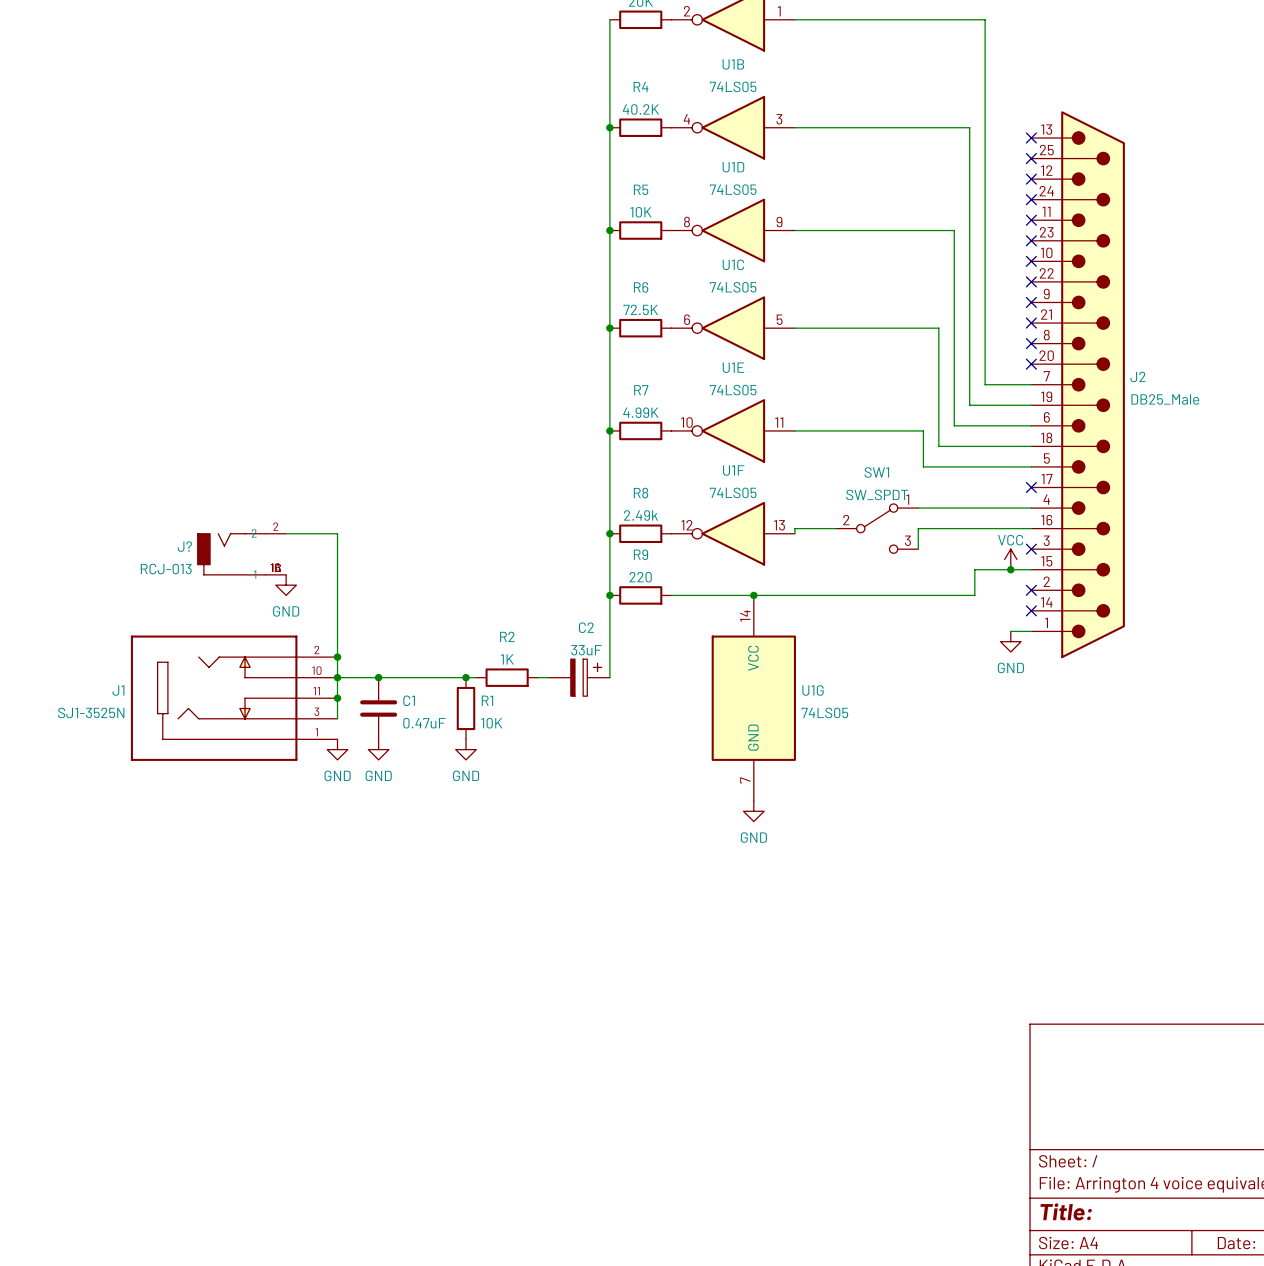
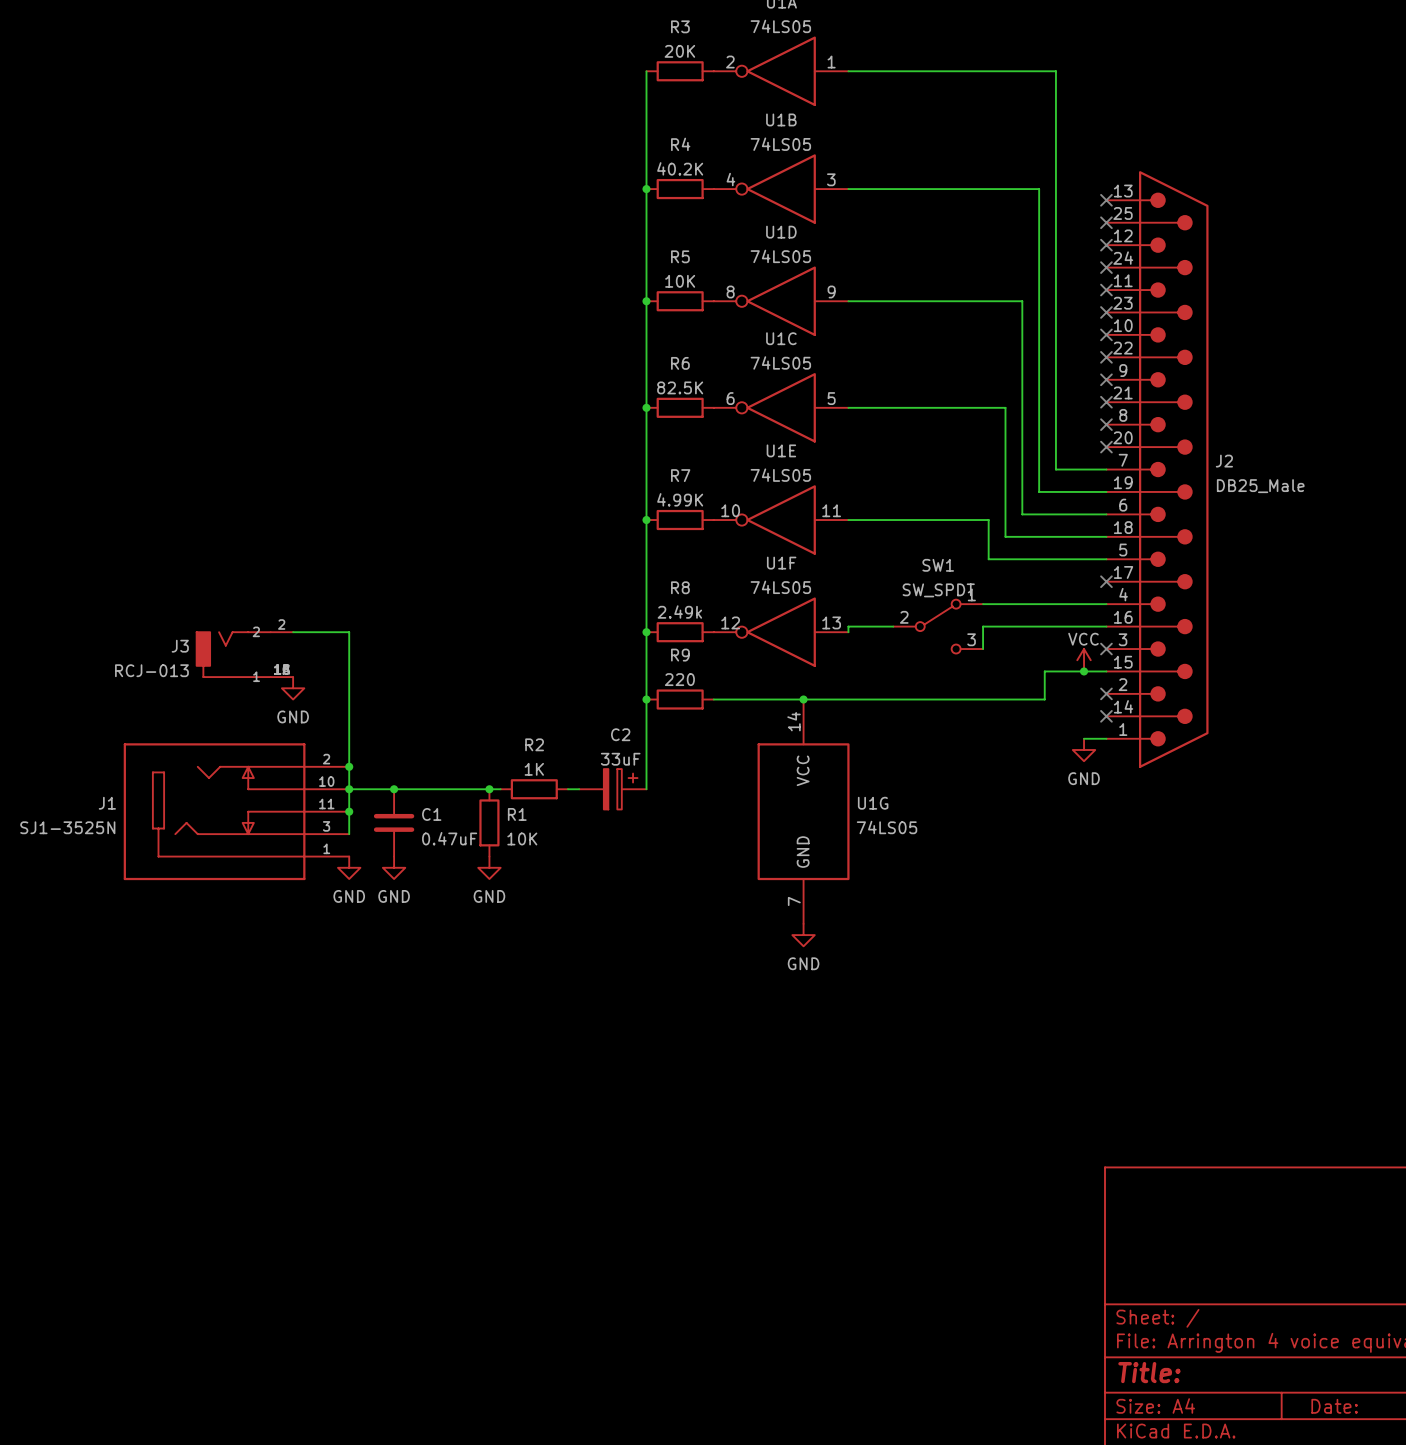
R6 value: 72.5K (640, 309) -> 82.5K (680, 387)
J? name: J? (184, 546) -> J3 (180, 646)

